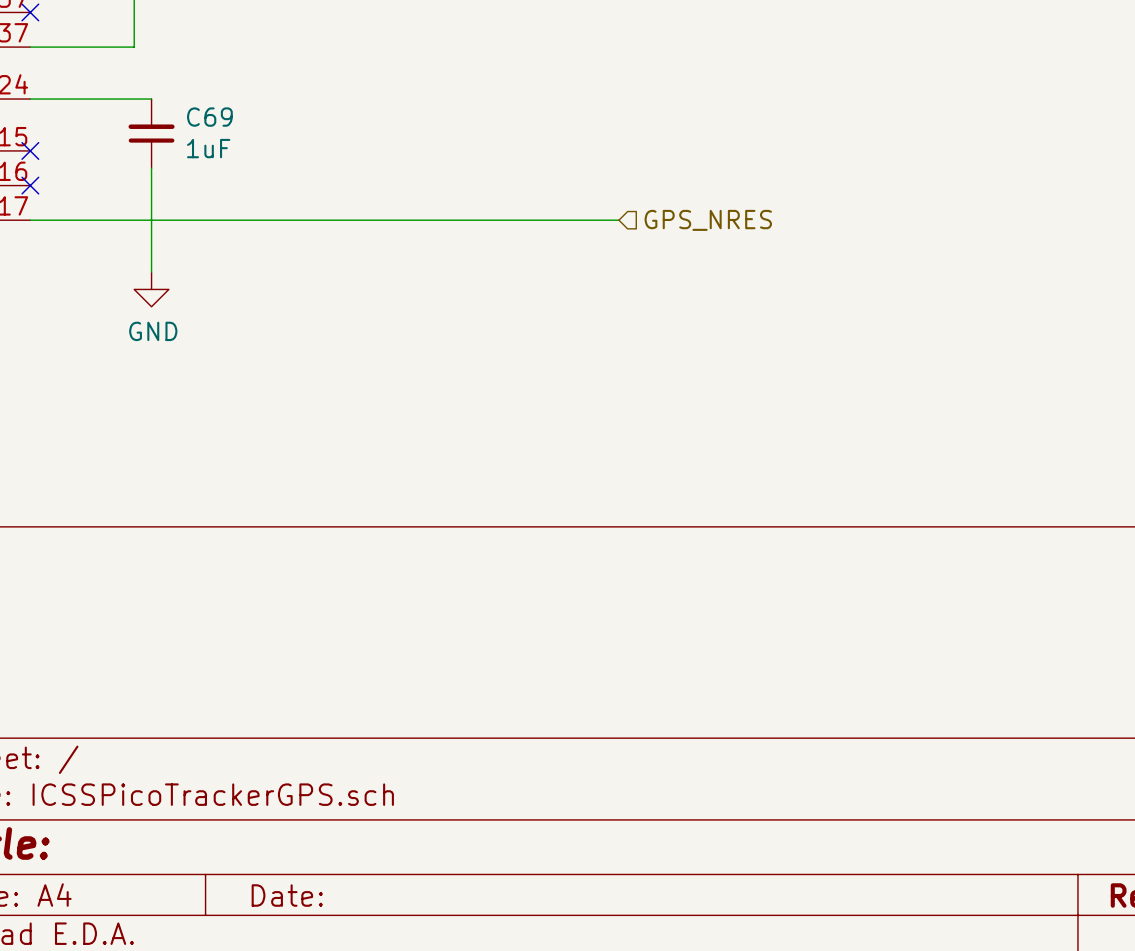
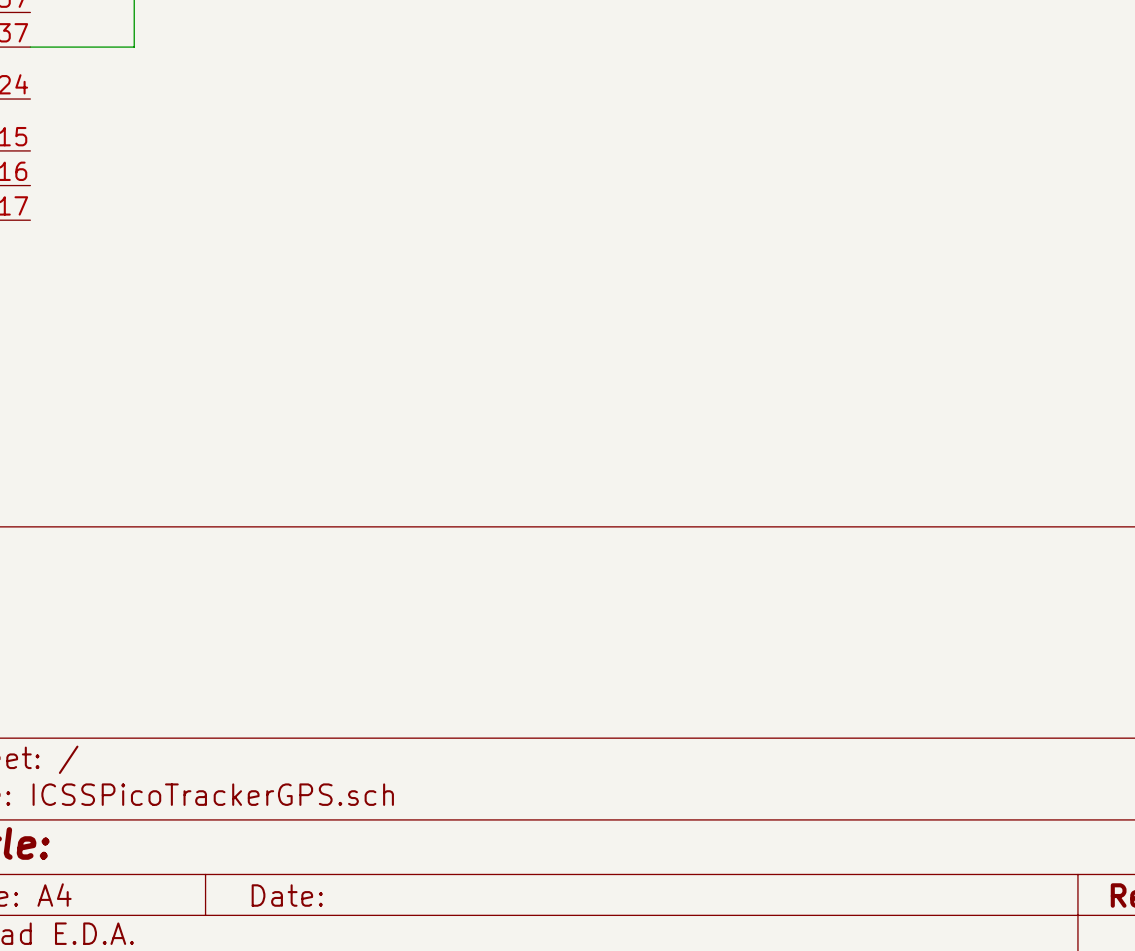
no-connect mark: (30, 12) -> none
wire: (30, 99) (151, 99) -> none
C69: 1uF (151, 133) -> none
no-connect mark: (30, 150) -> none
wire: (151, 168) (151, 272) -> none
no-connect mark: (30, 185) -> none
wire: (30, 220) (618, 220) -> none
hierarchical label: GPS_NRES (708, 220) -> none
power symbol: GND (151, 289) -> none

